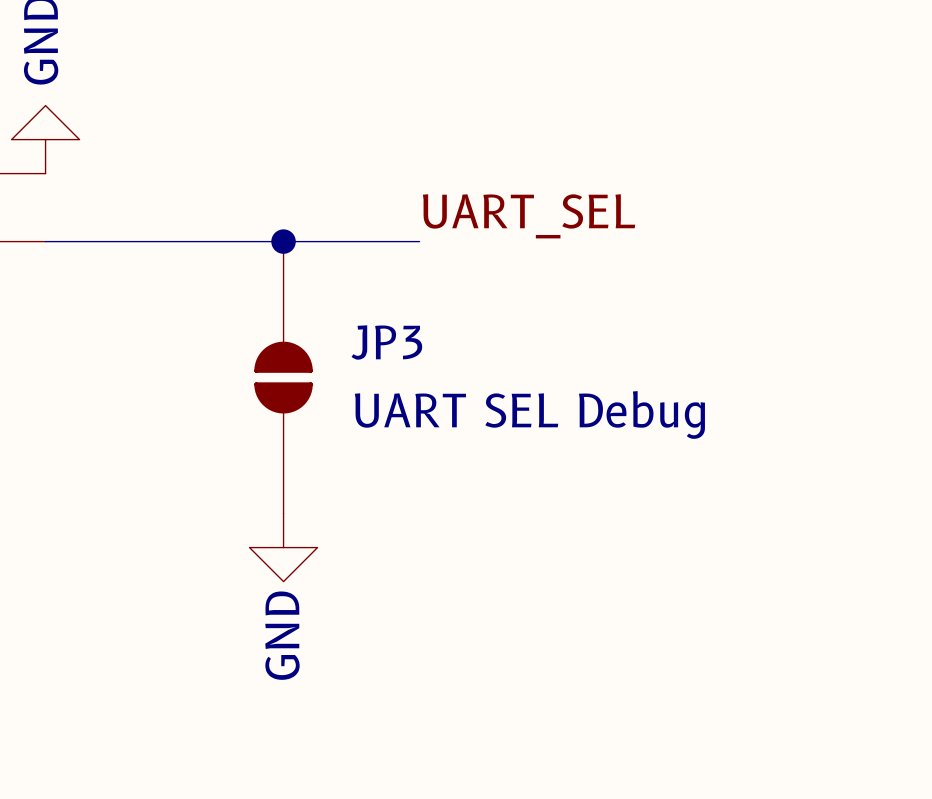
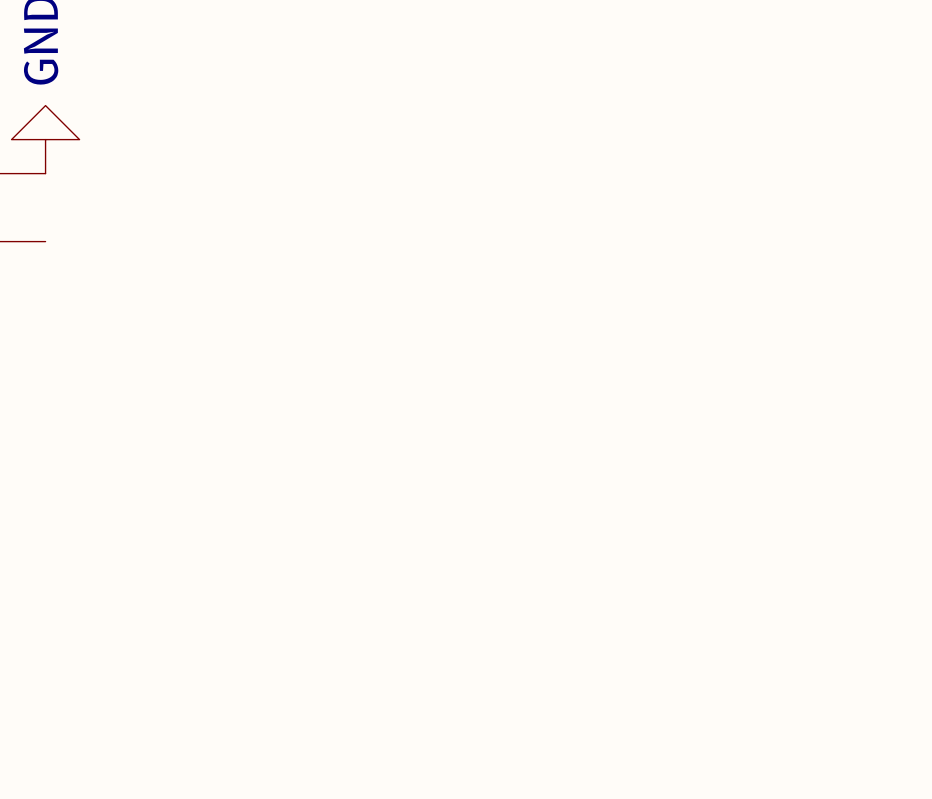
label: UART_SEL (529, 216) -> none
wire: (45, 241) (419, 241) -> none
junction: (283, 241) -> none
JP3: UART SEL Debug (283, 377) -> none
power symbol: GND (283, 547) -> none

